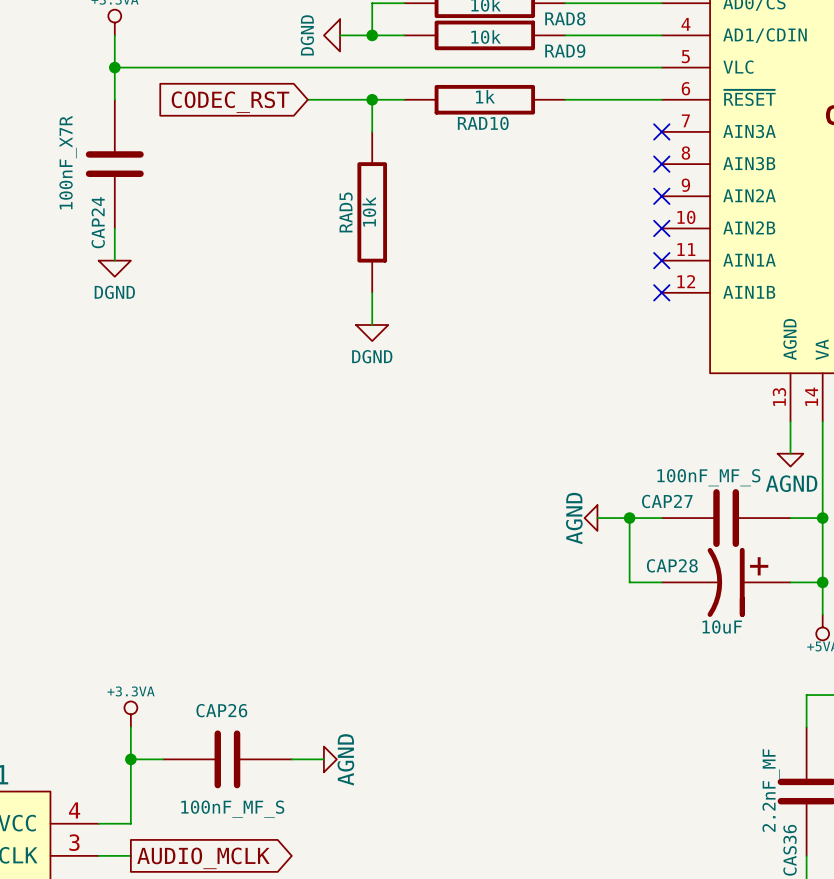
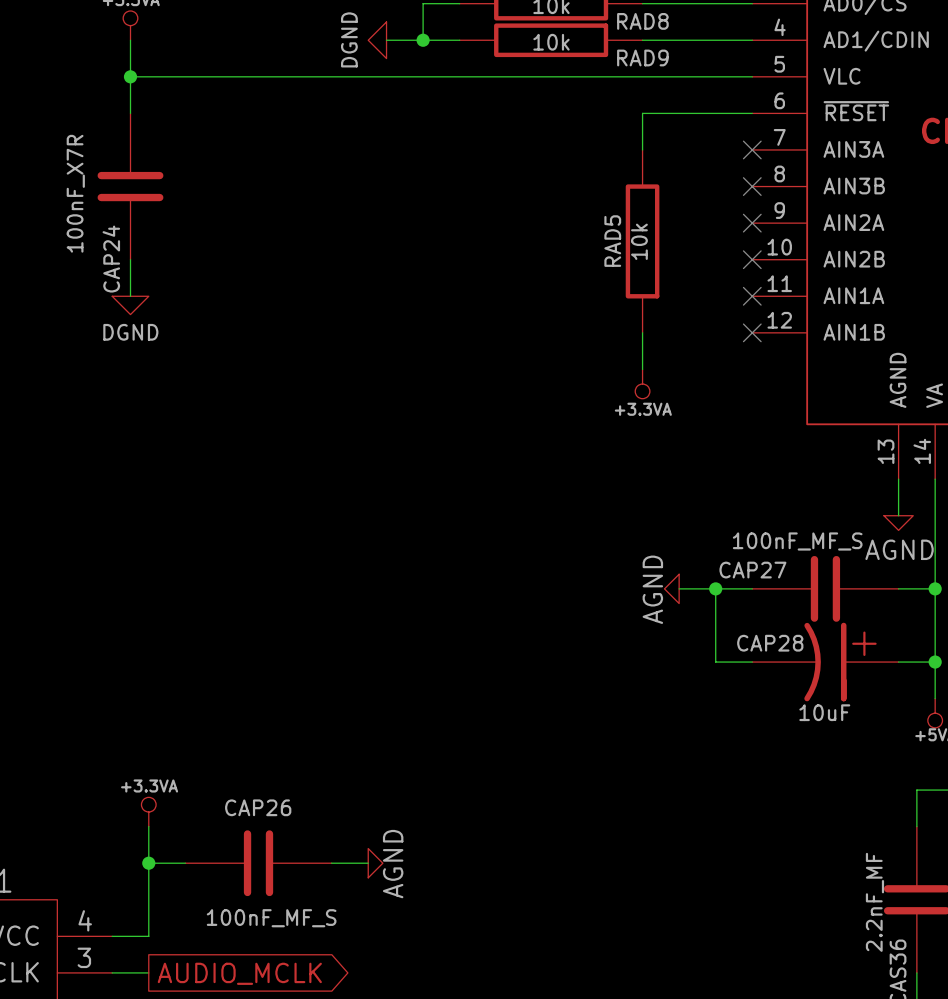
wire: (307, 99) (404, 99) -> none
wire: (372, 99) (372, 131) -> (642, 113) (642, 149)
junction: (372, 99) -> none
RAD10: 1k (484, 99) -> none
global label: CODEC_RST (230, 102) -> none
RAD5 position: (372, 212) -> (642, 241)
wire: (372, 292) (372, 324) -> (642, 332) (642, 369)
power symbol: DGND (372, 333) -> none
power symbol: none -> +3.3VA (642, 384)

